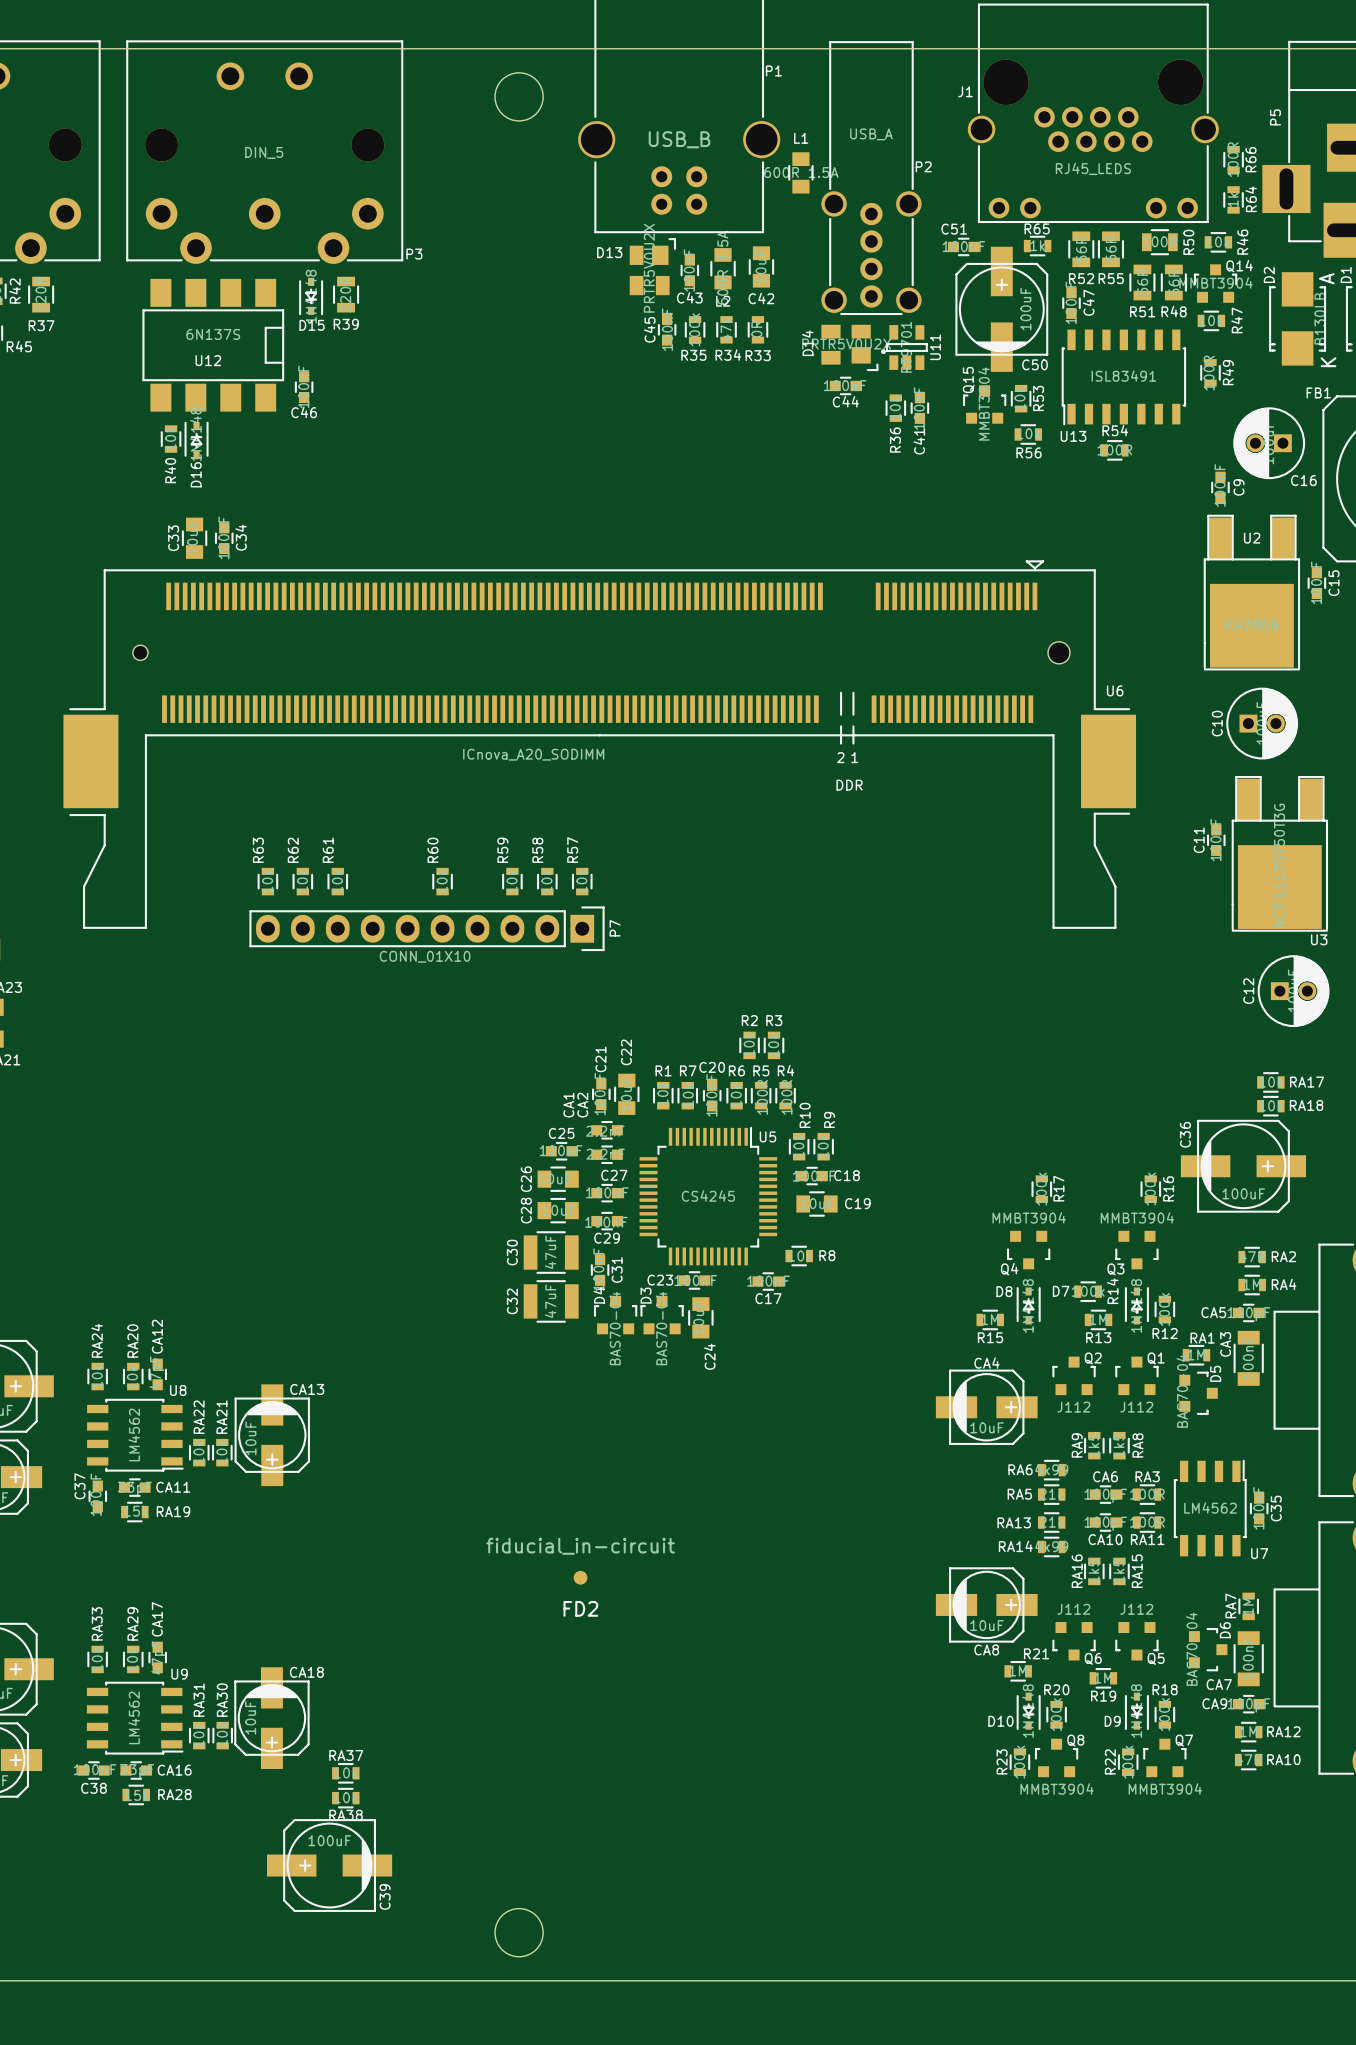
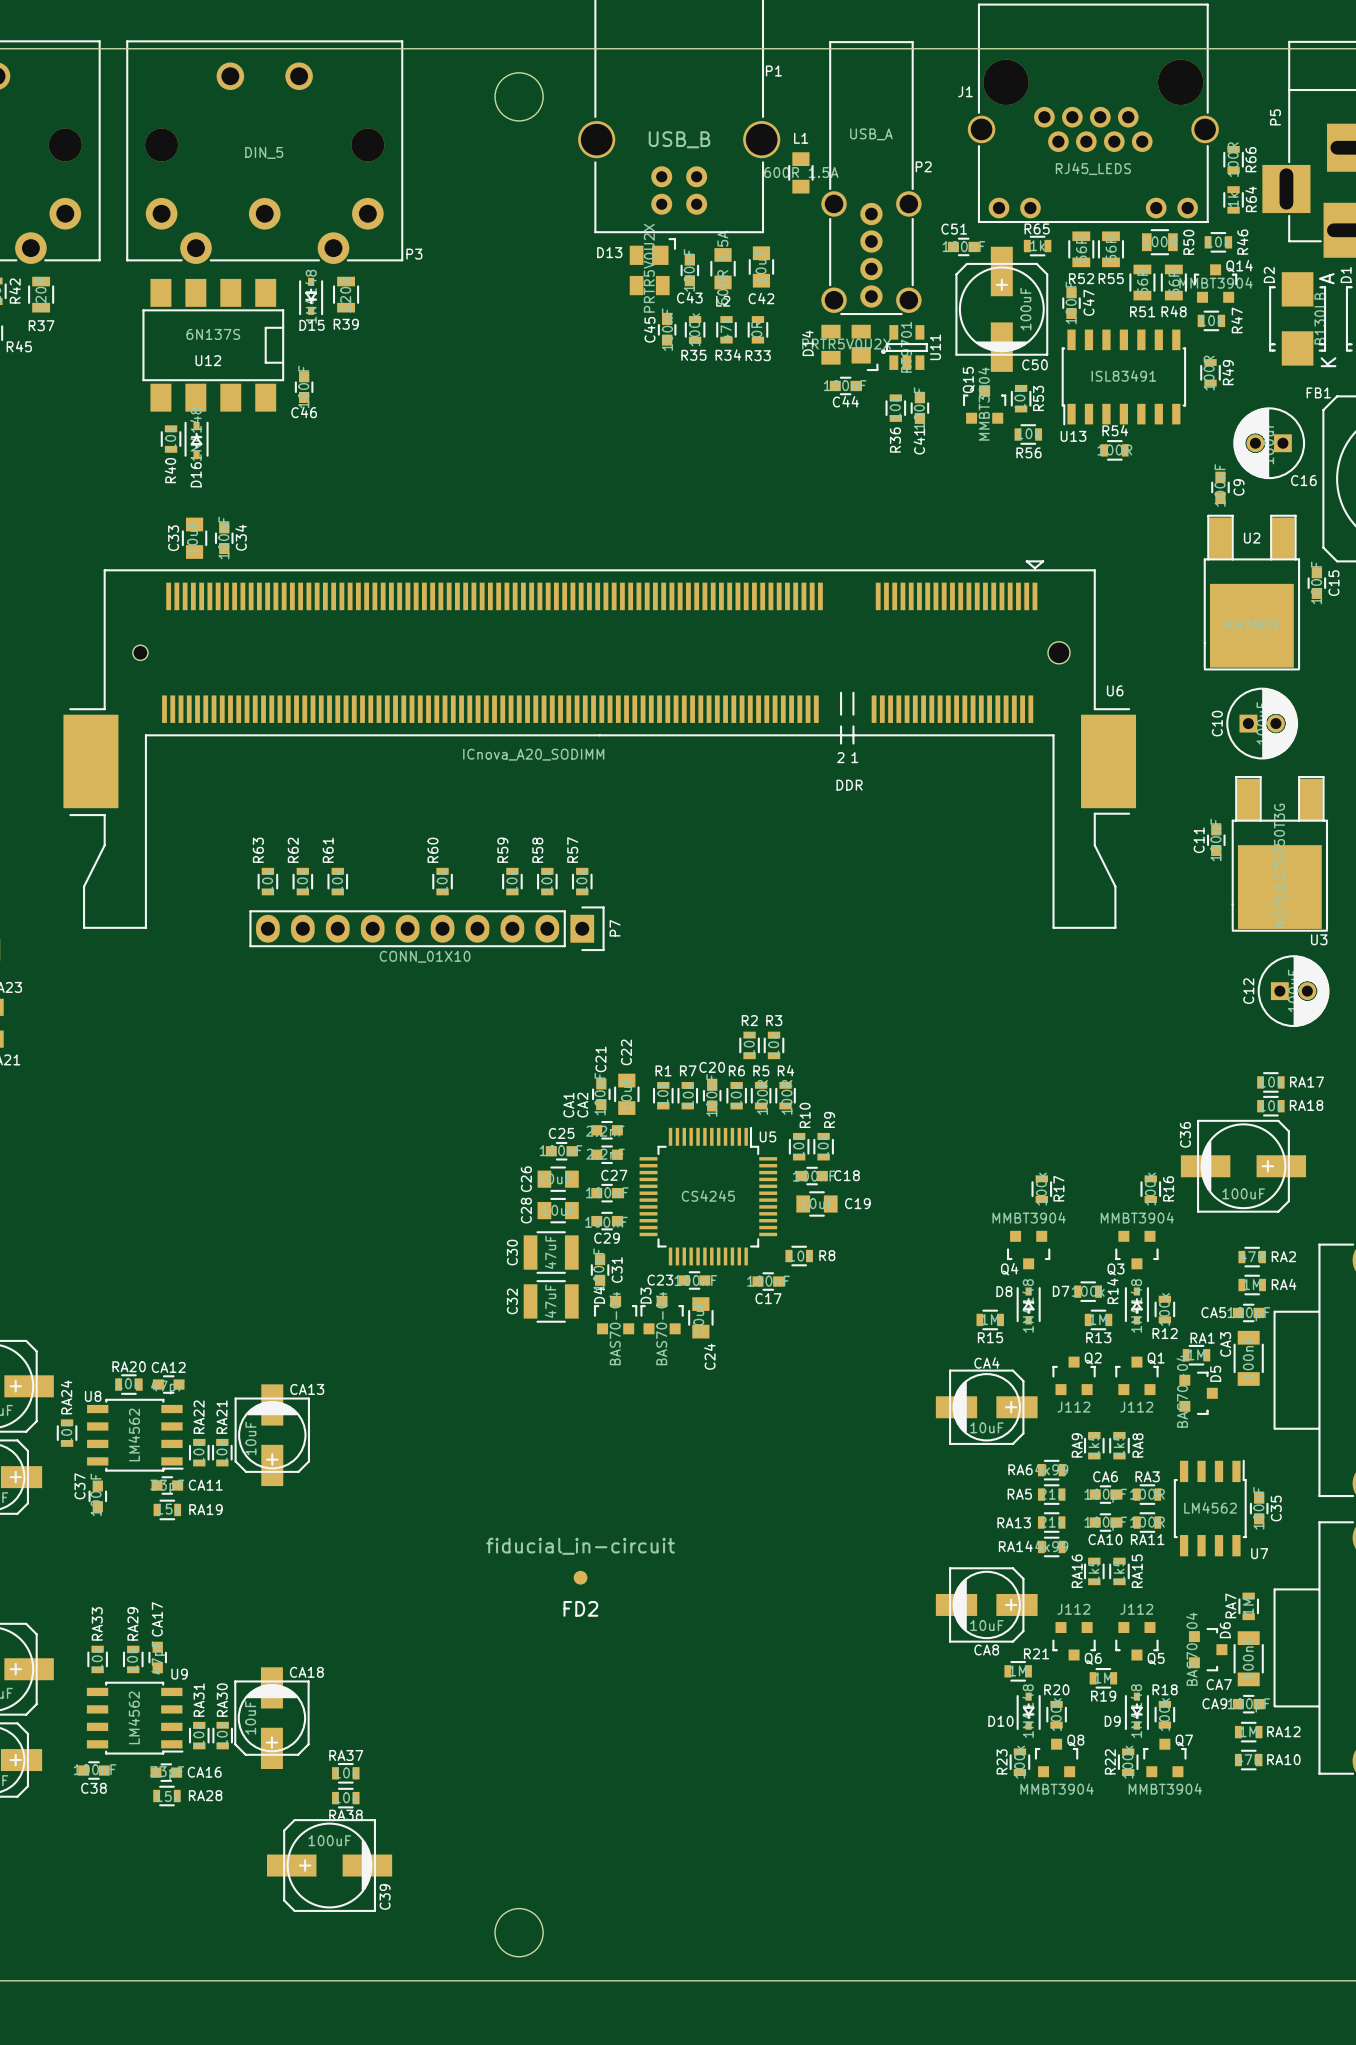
CA12 rotation: 0° (157, 1374) -> 90° clockwise (168, 1384)
RA24 position: (97, 1376) -> (67, 1433)
RA20 rotation: 0° (133, 1376) -> 90° clockwise (128, 1384)
U8 name position: U8 (178, 1390) -> U8 (93, 1396)
CA11 position: (134, 1487) -> (167, 1485)
RA19 position: (134, 1512) -> (167, 1509)
CA16 position: (136, 1770) -> (166, 1772)
RA28 position: (136, 1794) -> (166, 1796)

